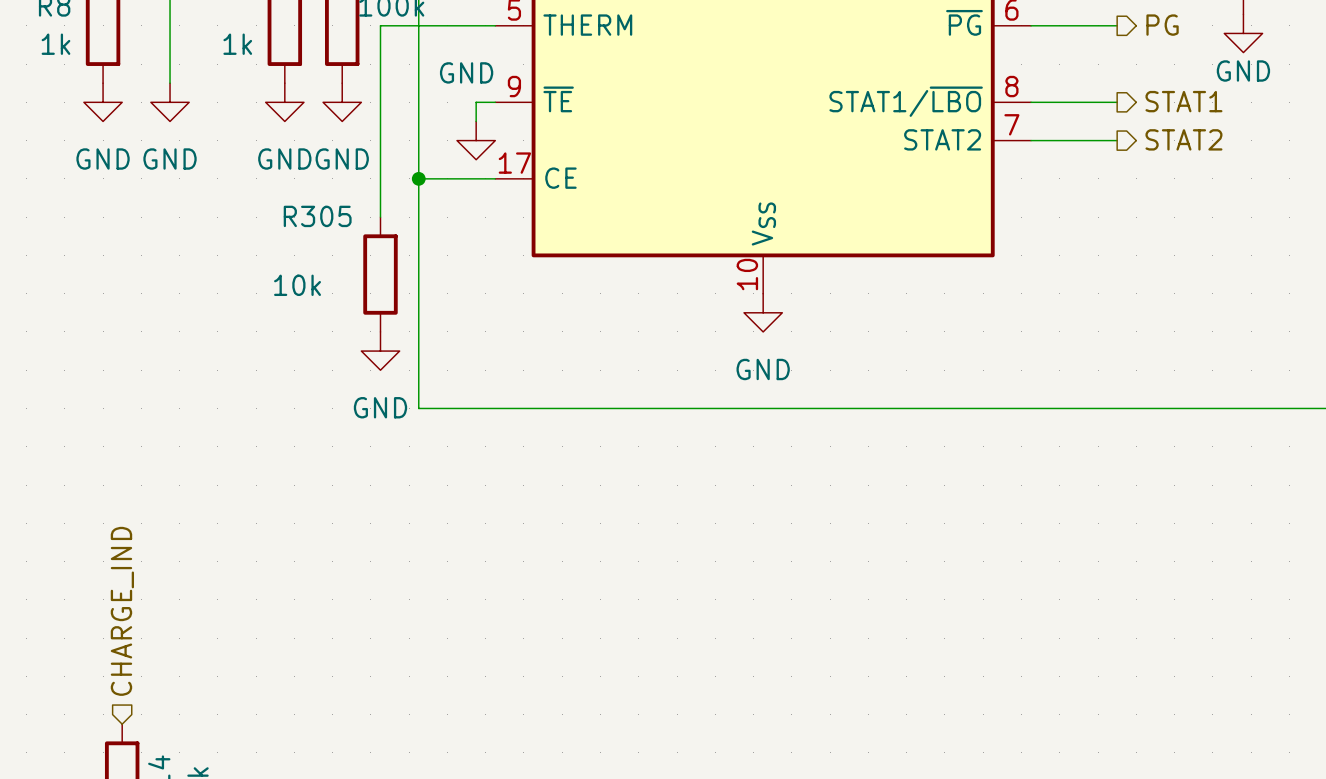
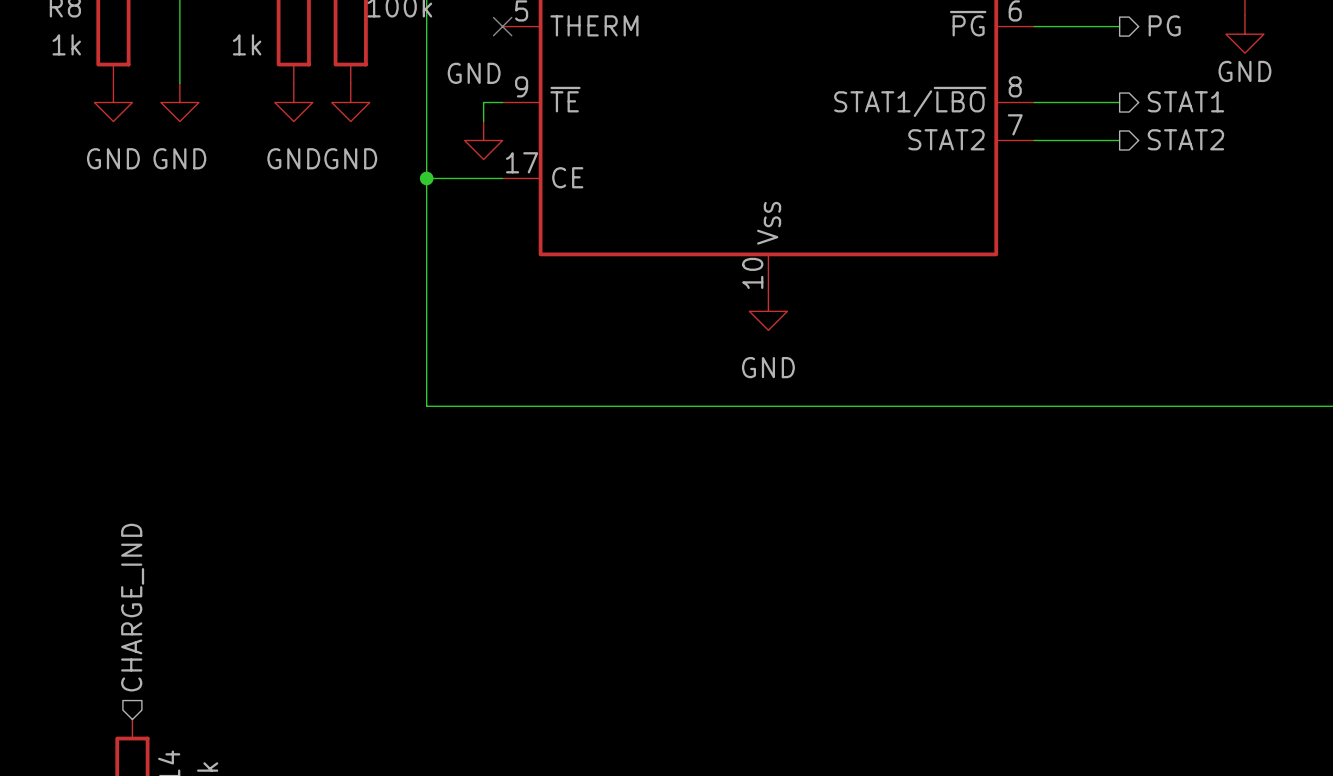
wire: (495, 25) (380, 25) (380, 217) -> none
no-connect mark: none -> (502, 26)
R305: 10k (380, 274) -> none
power symbol: GND (380, 351) -> none

